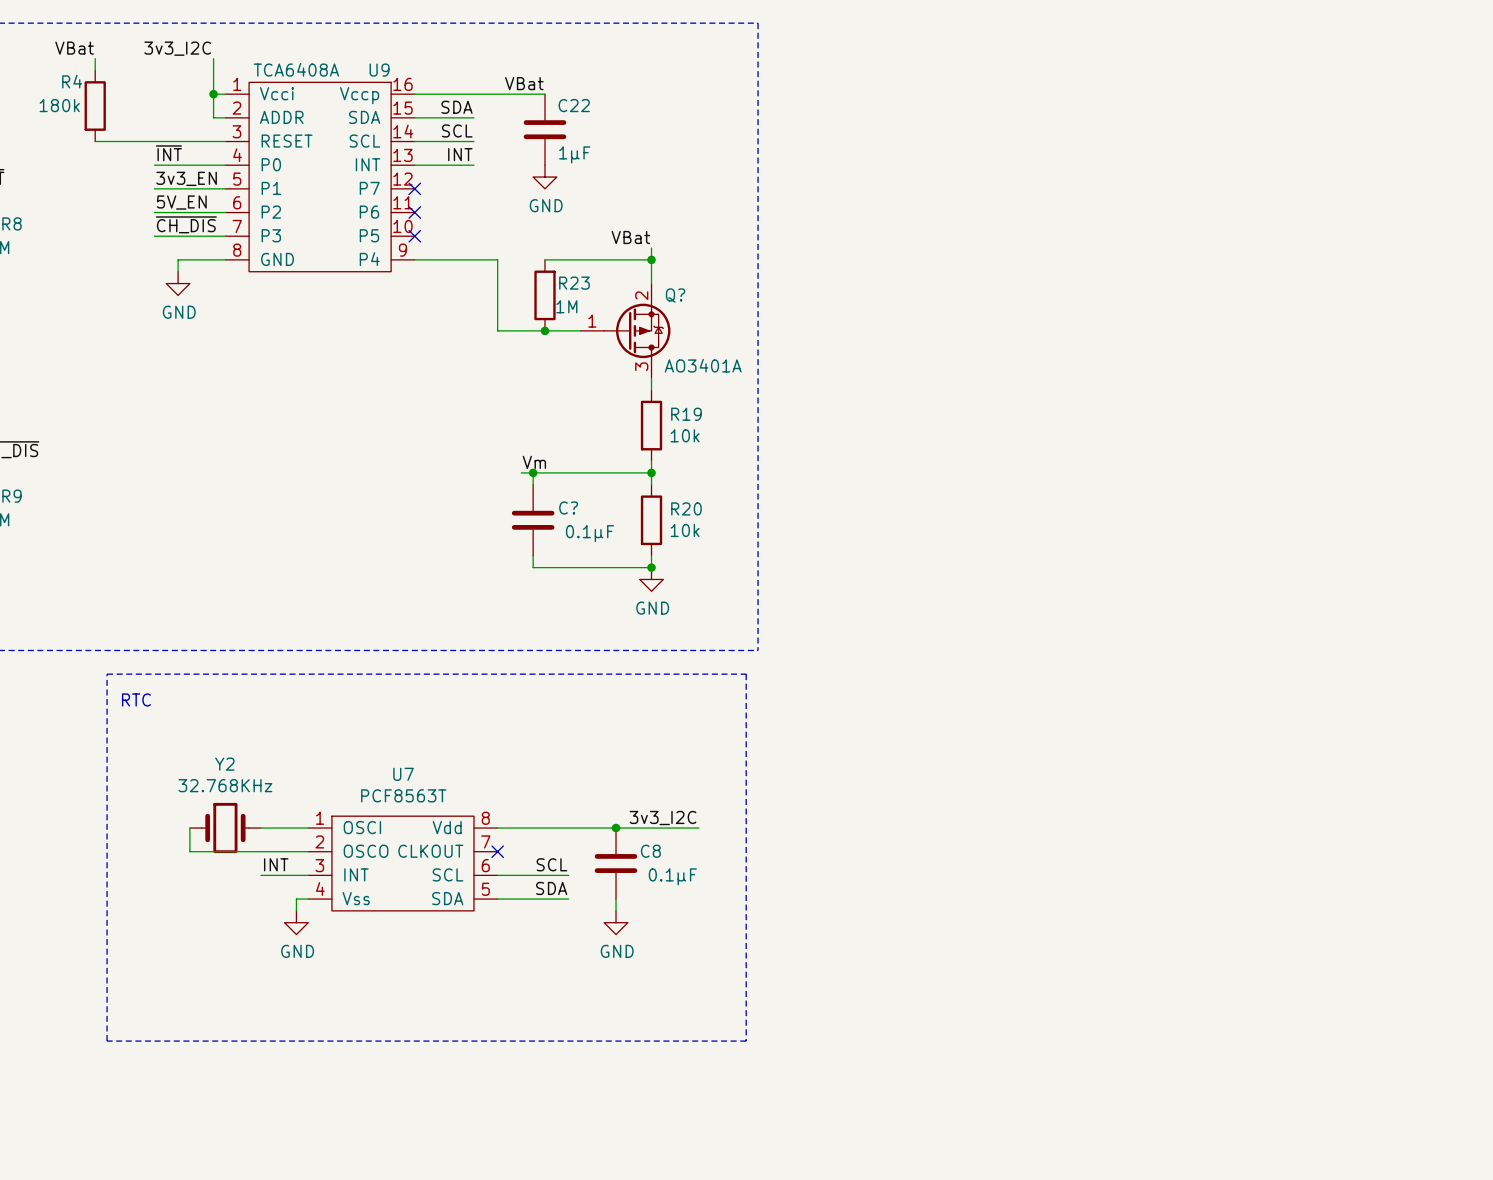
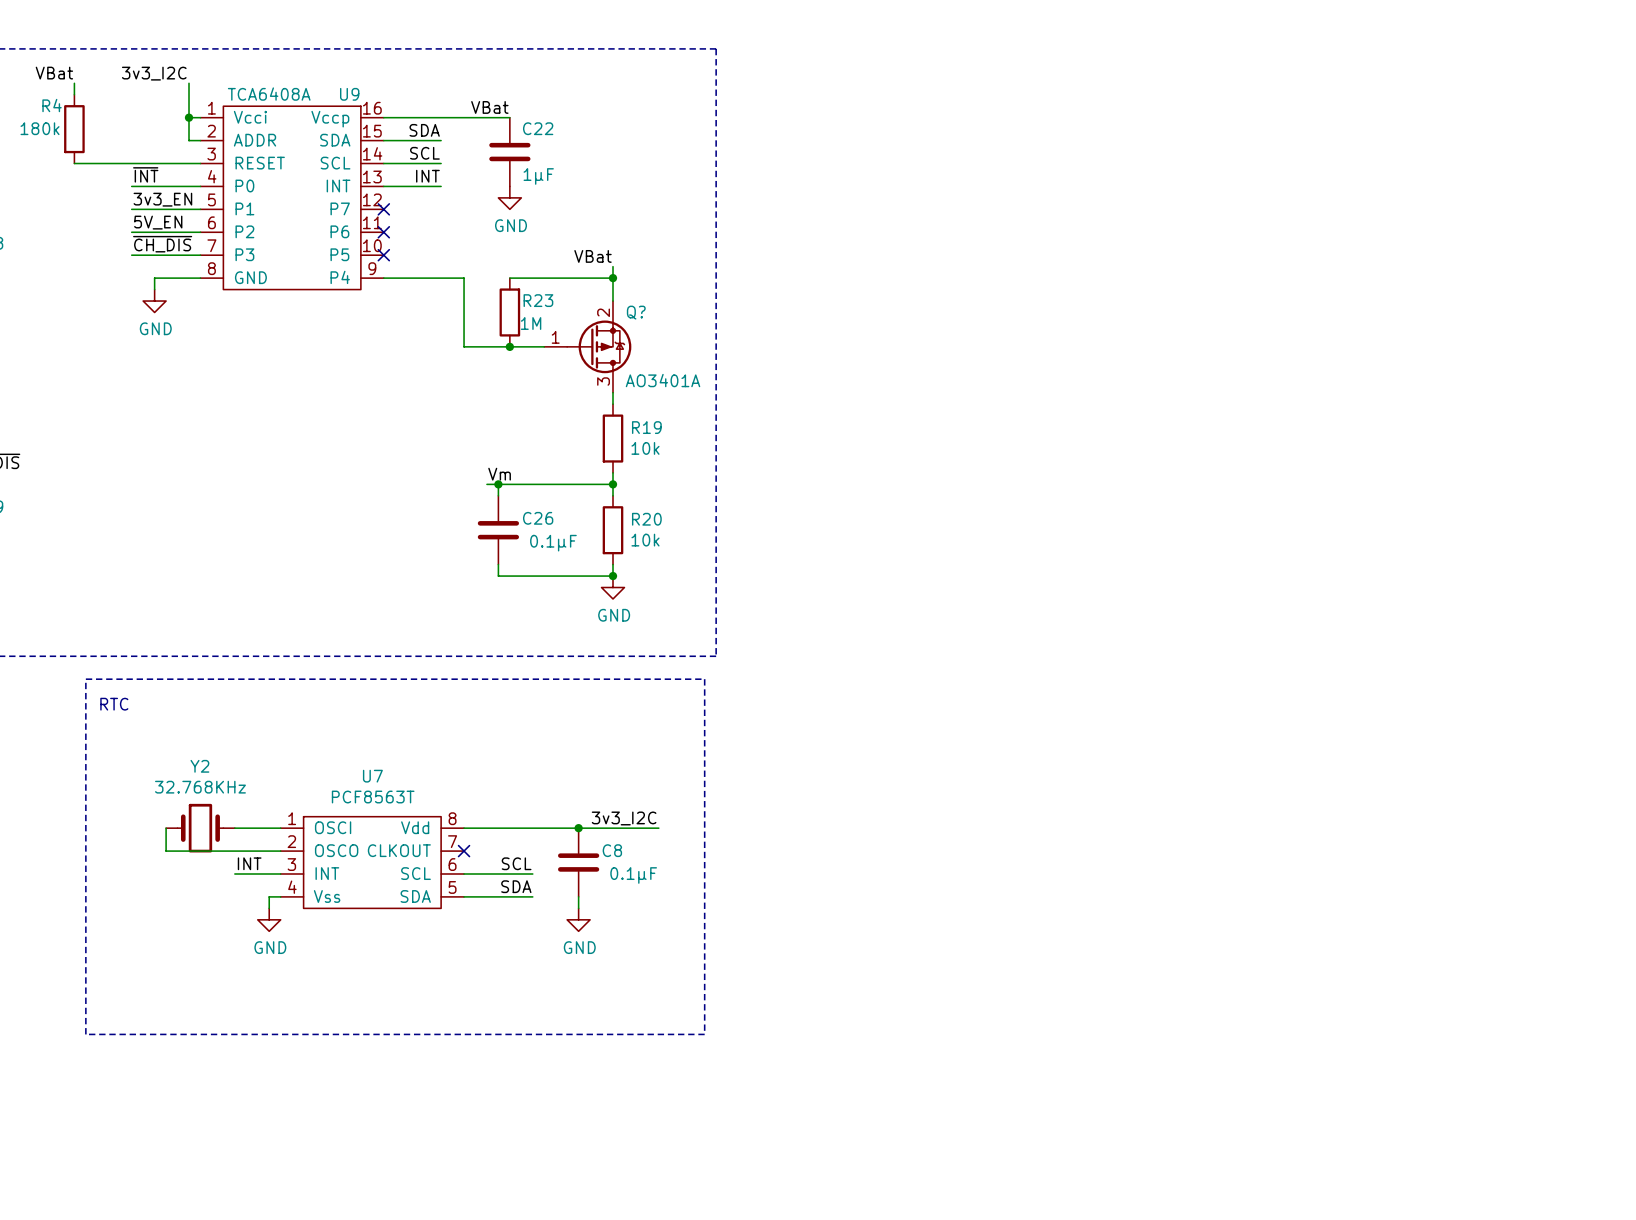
C? name: C? (568, 508) -> C26 (538, 518)

